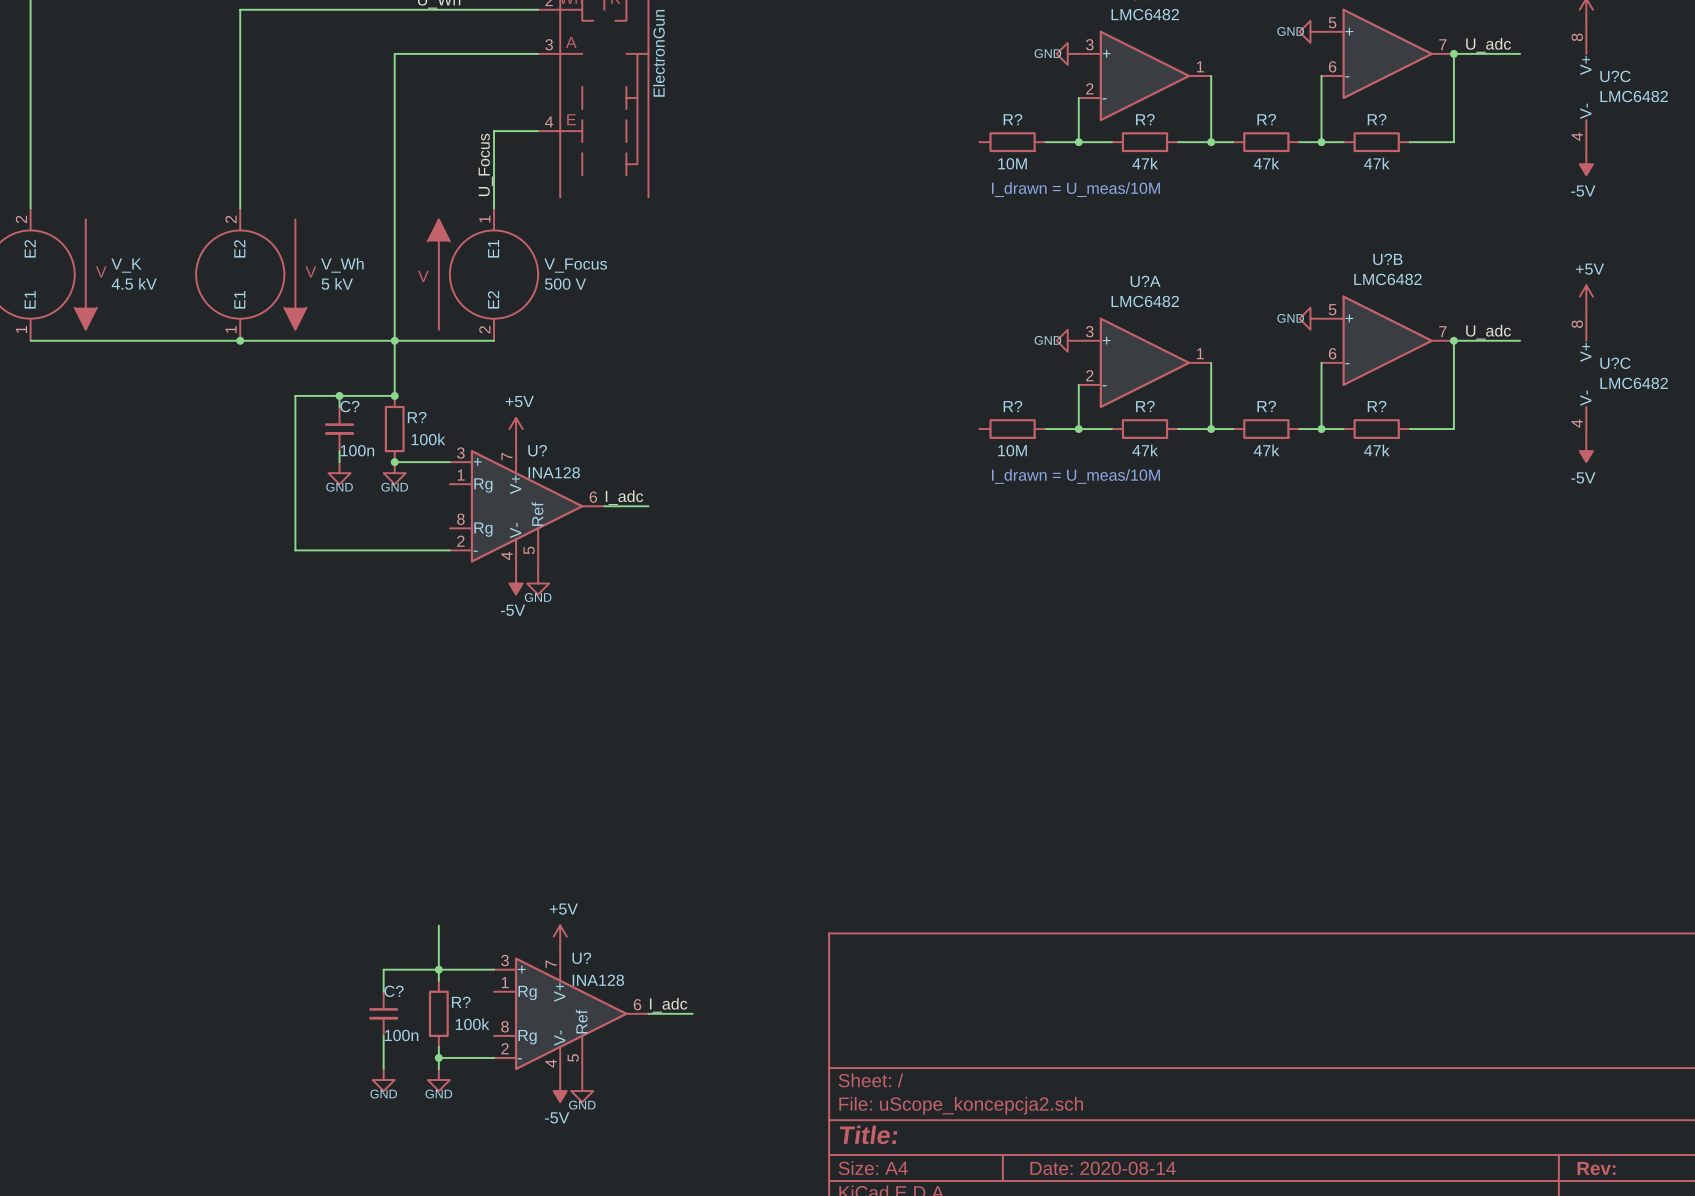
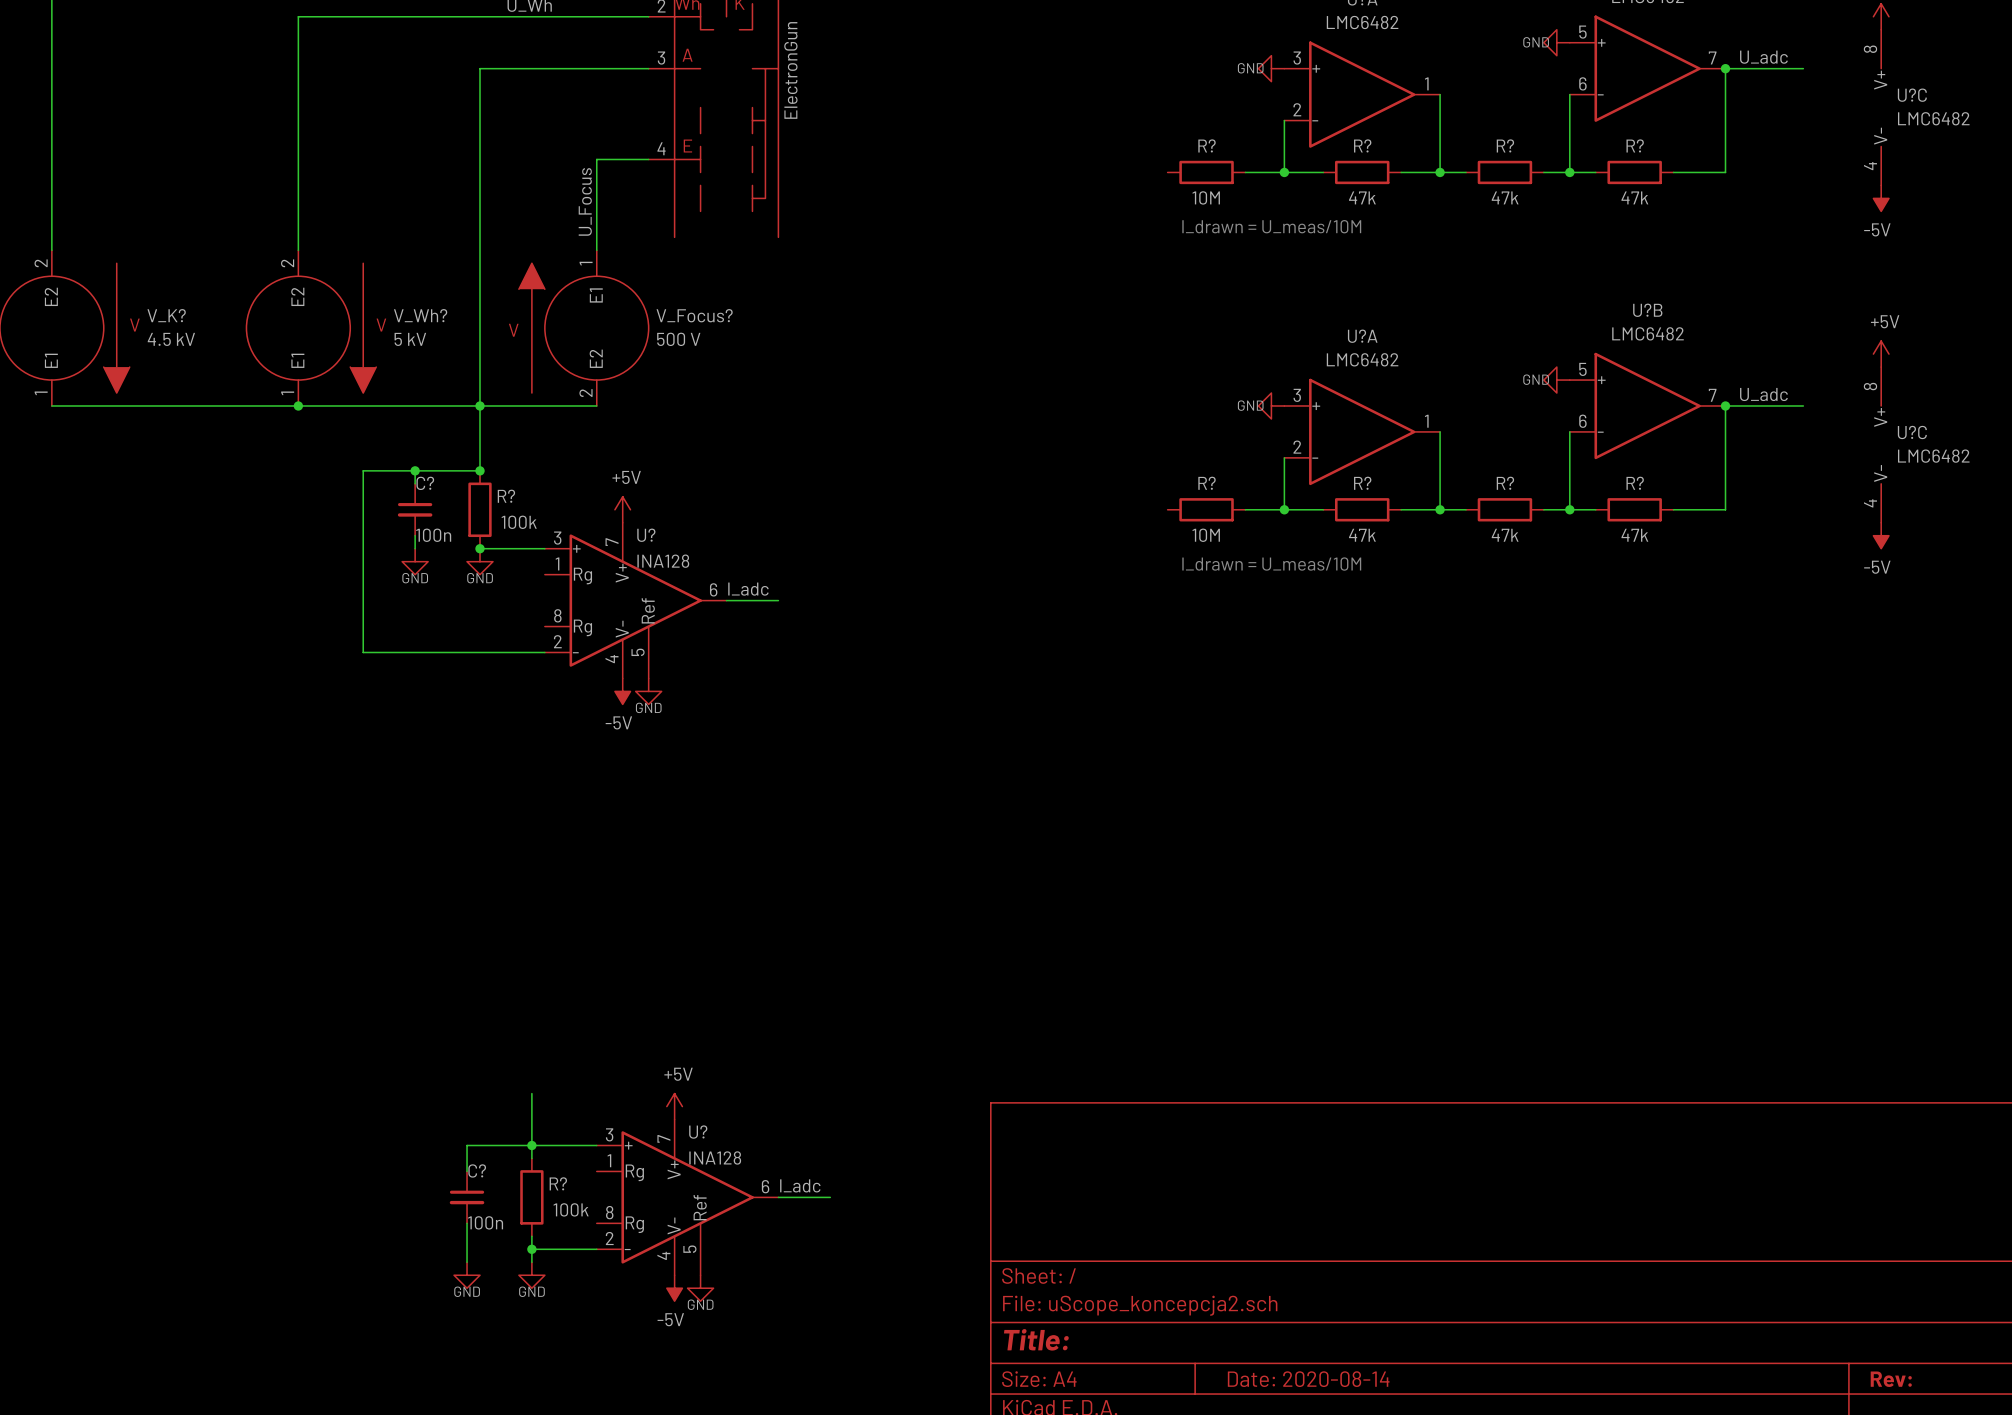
V_K name: V_K (126, 265) -> V_K? (166, 315)
V_Wh name: V_Wh (342, 265) -> V_Wh? (420, 315)
V_Focus name: V_Focus (575, 265) -> V_Focus? (694, 315)

